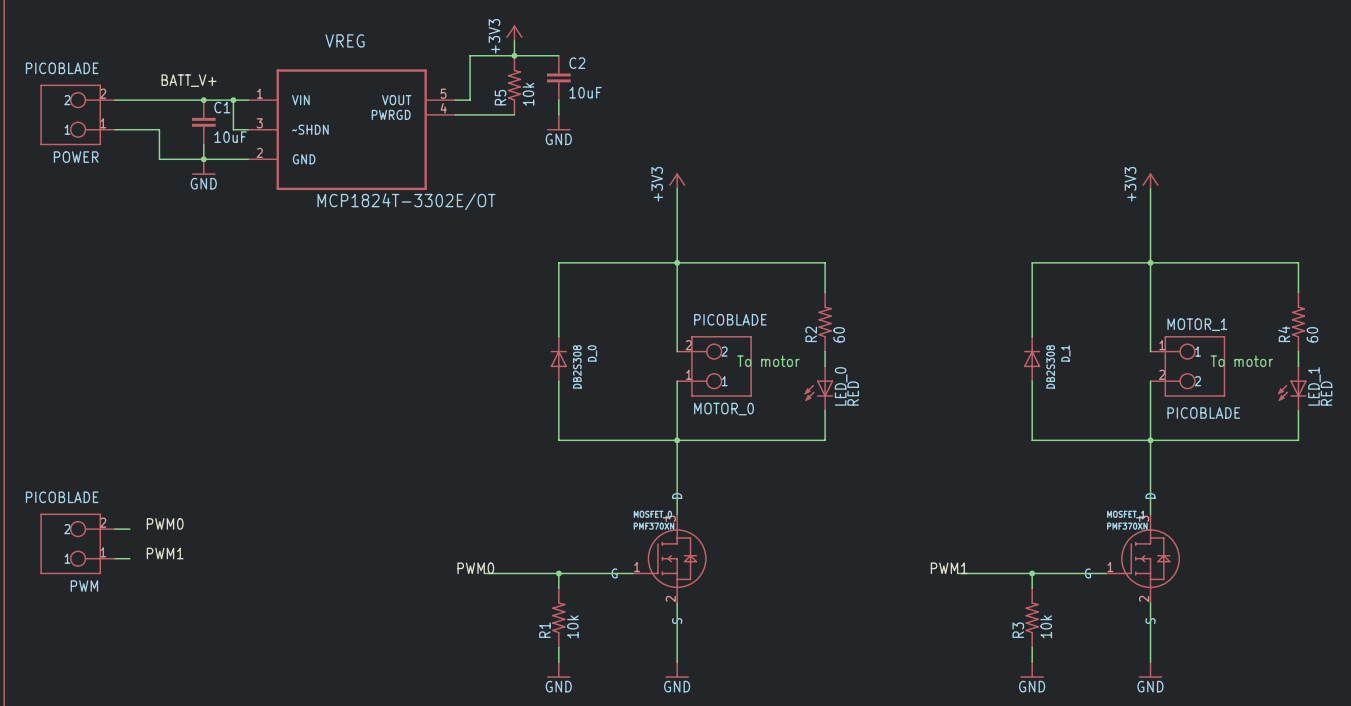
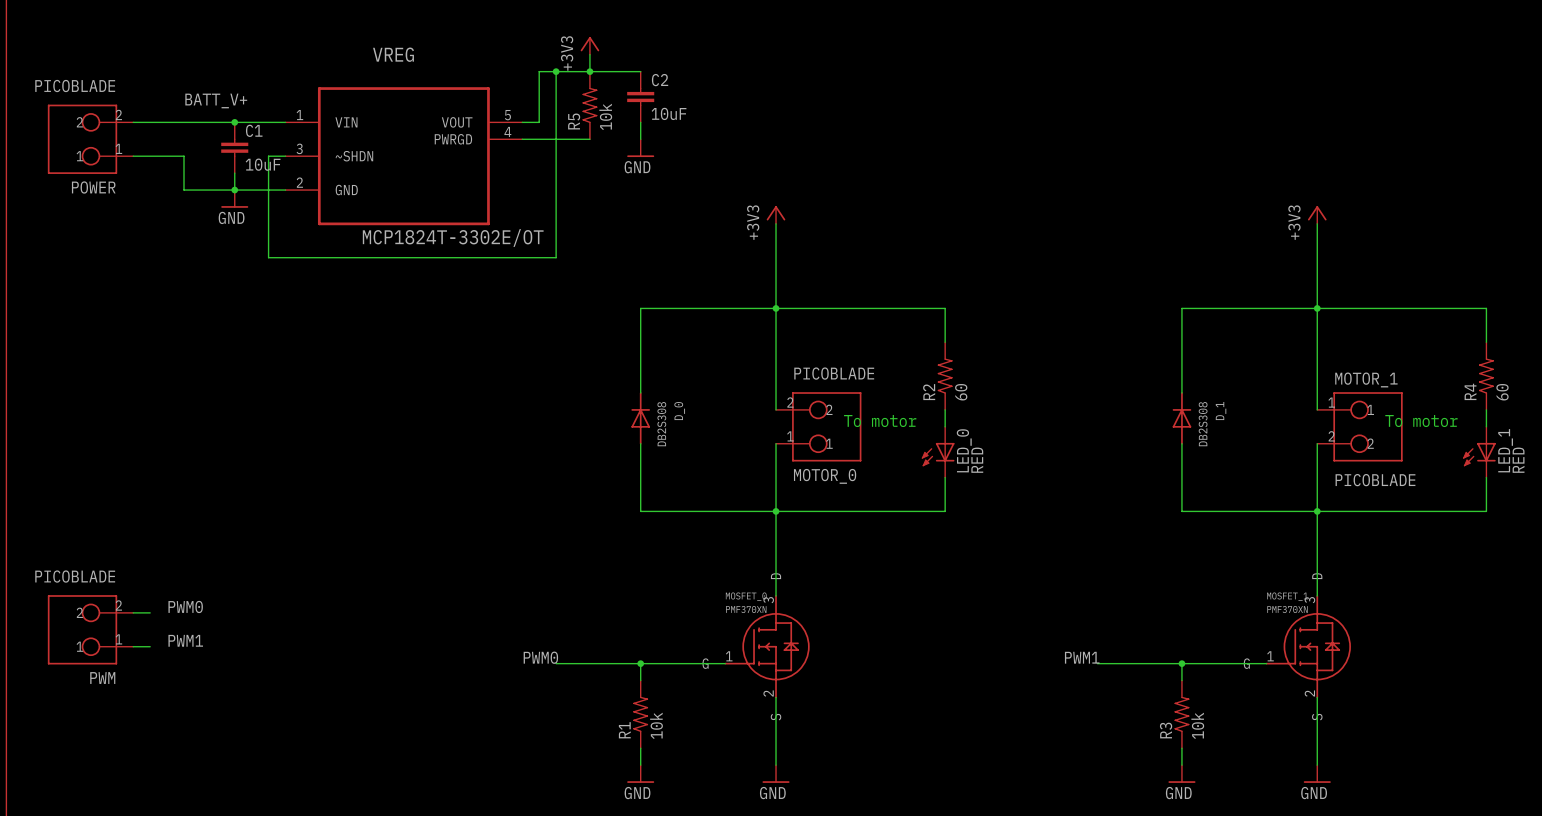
junction: none -> (556, 71)
wire: (233, 100) (233, 129) -> (556, 71) (556, 257) (268, 257) (268, 156)
junction: (233, 100) -> none

